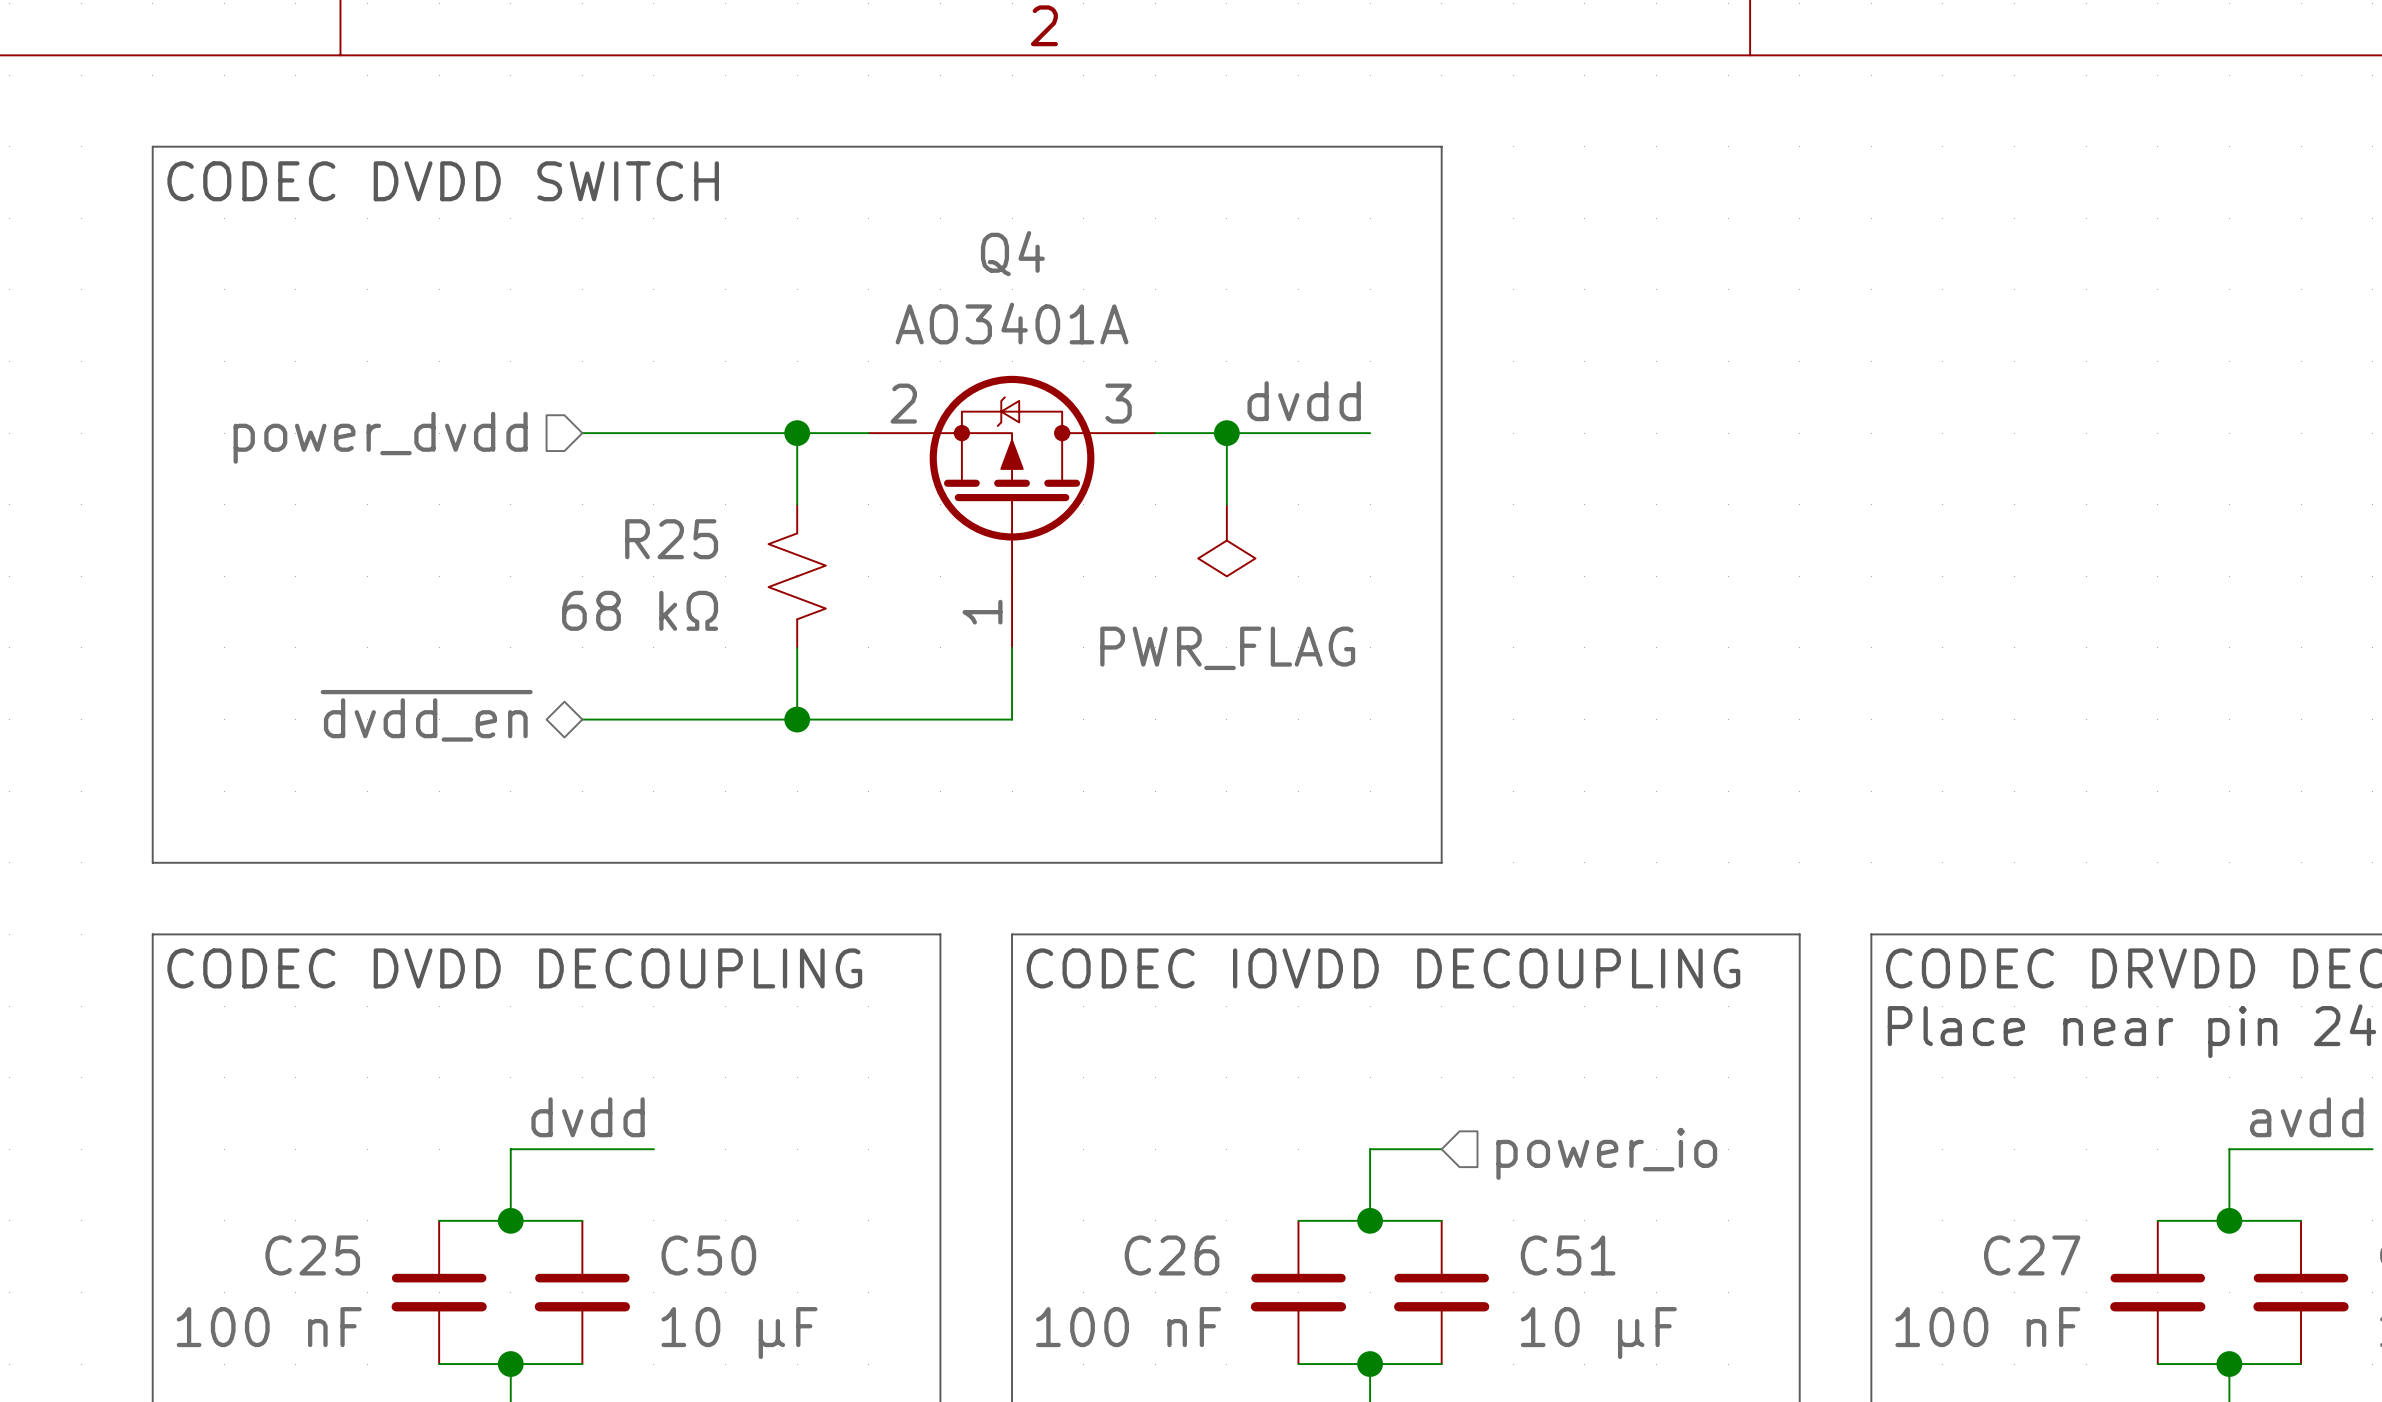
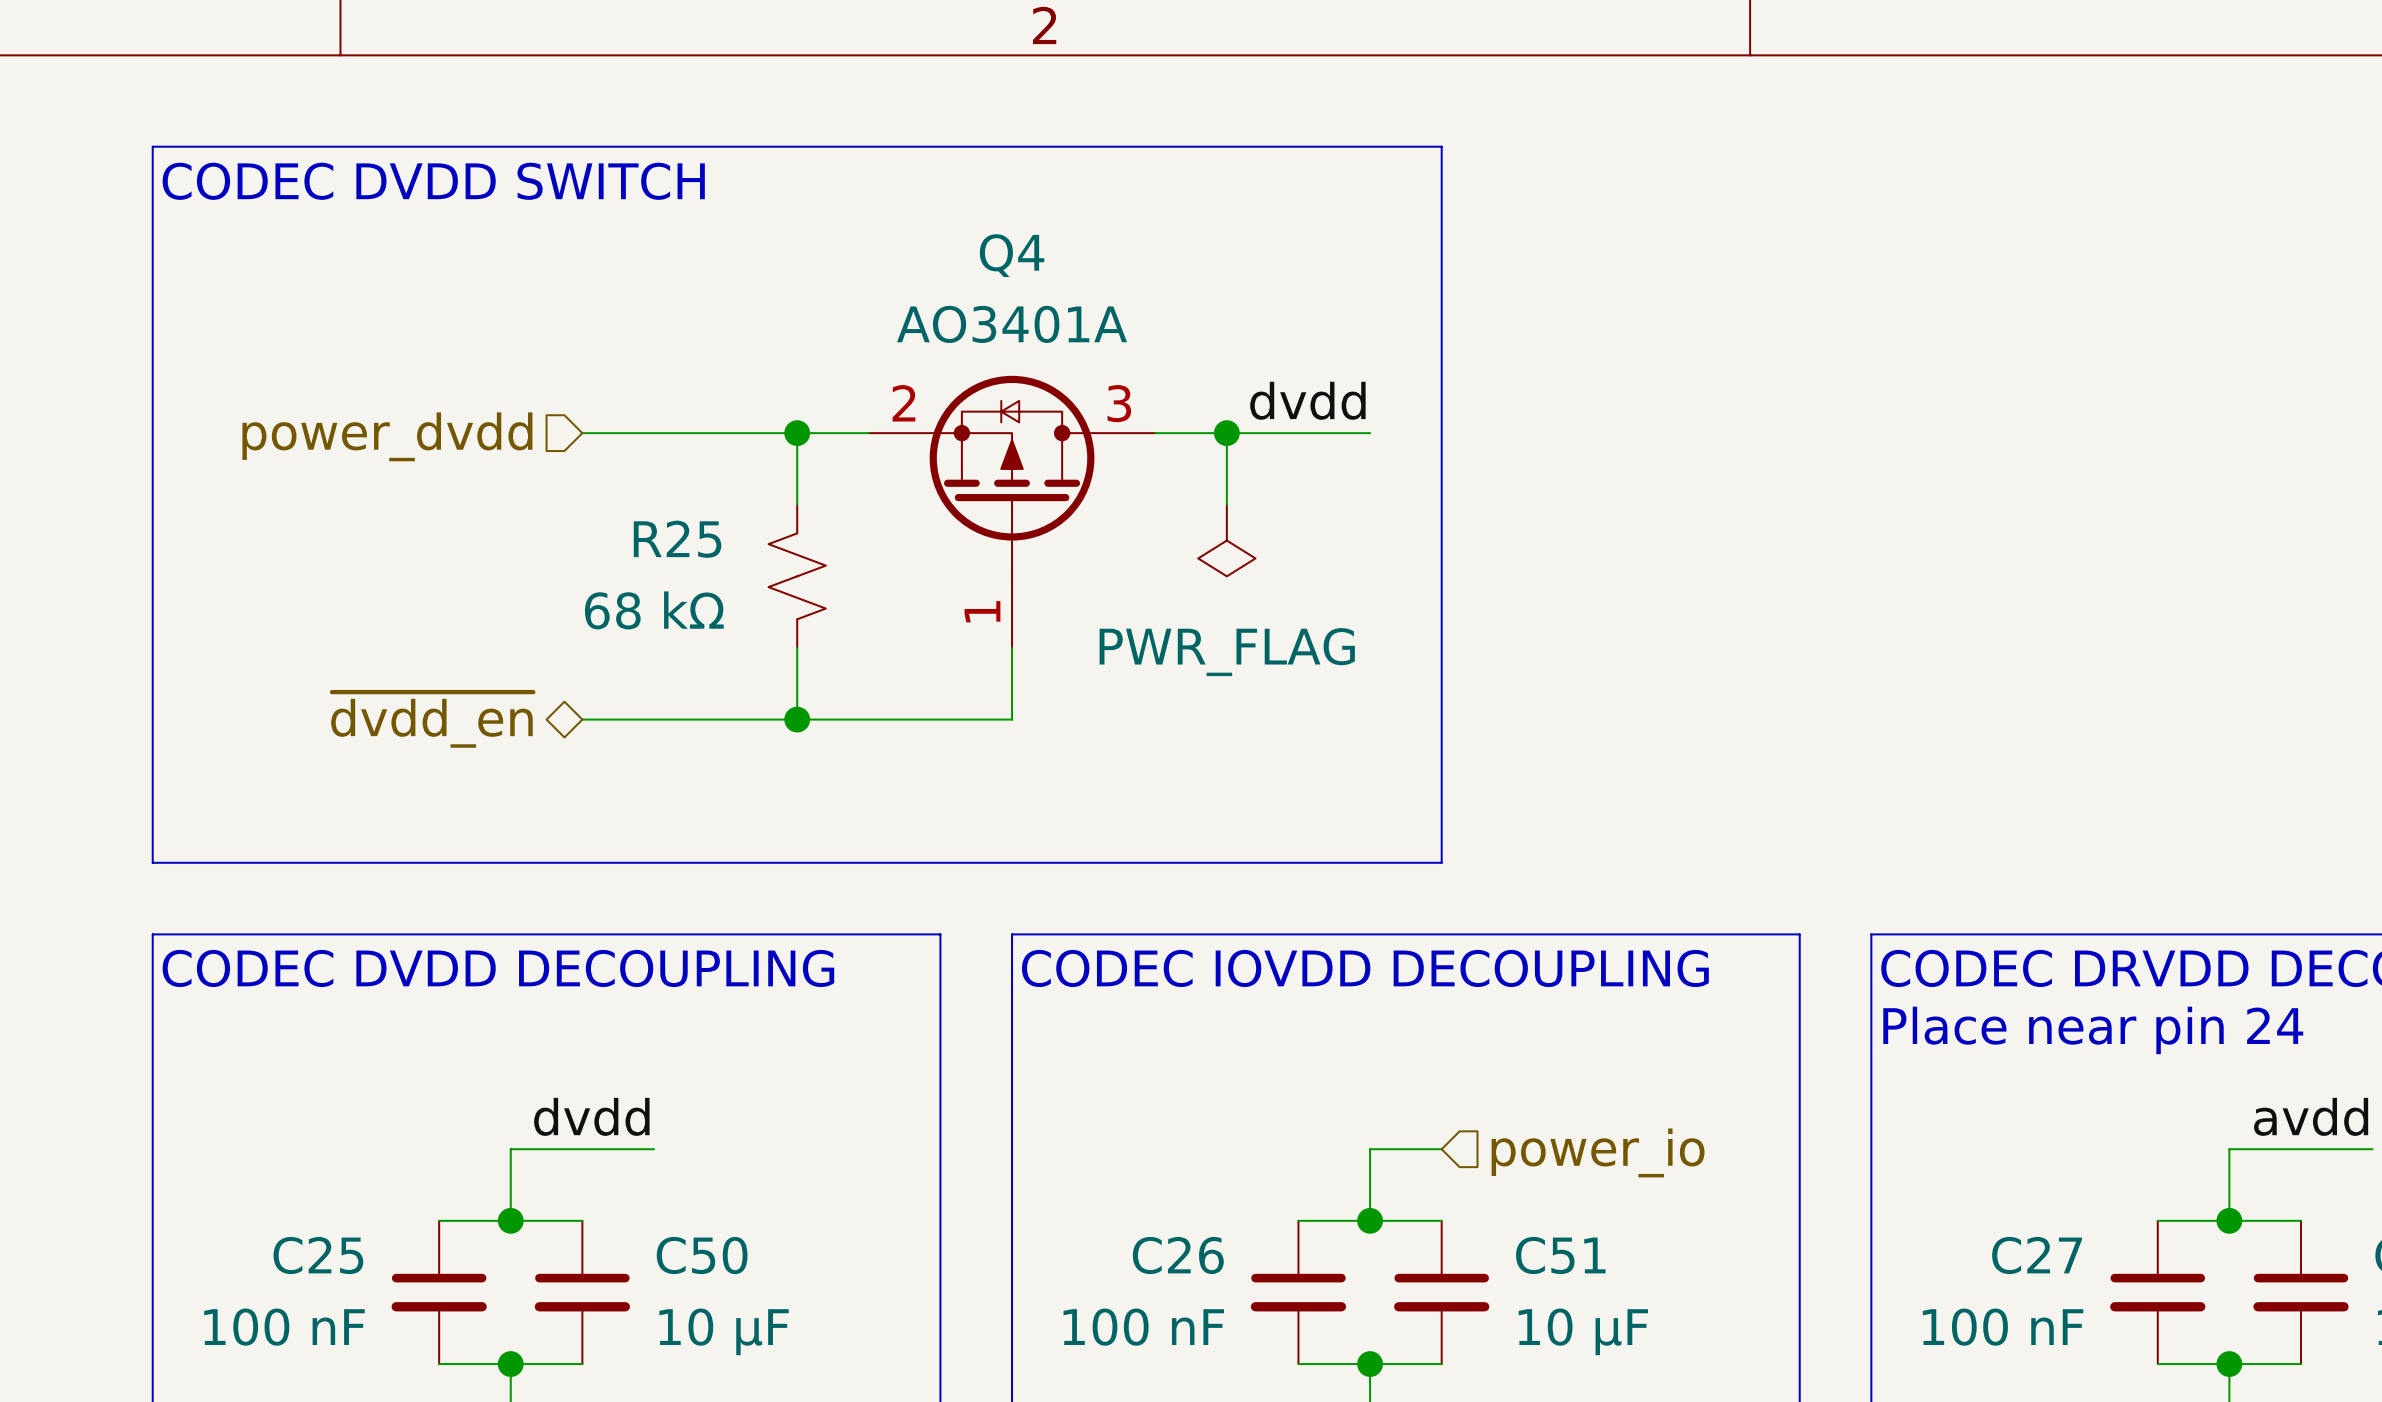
Q4 symbol: [868, 375, 1156, 648] -> [868, 375, 1156, 648]

